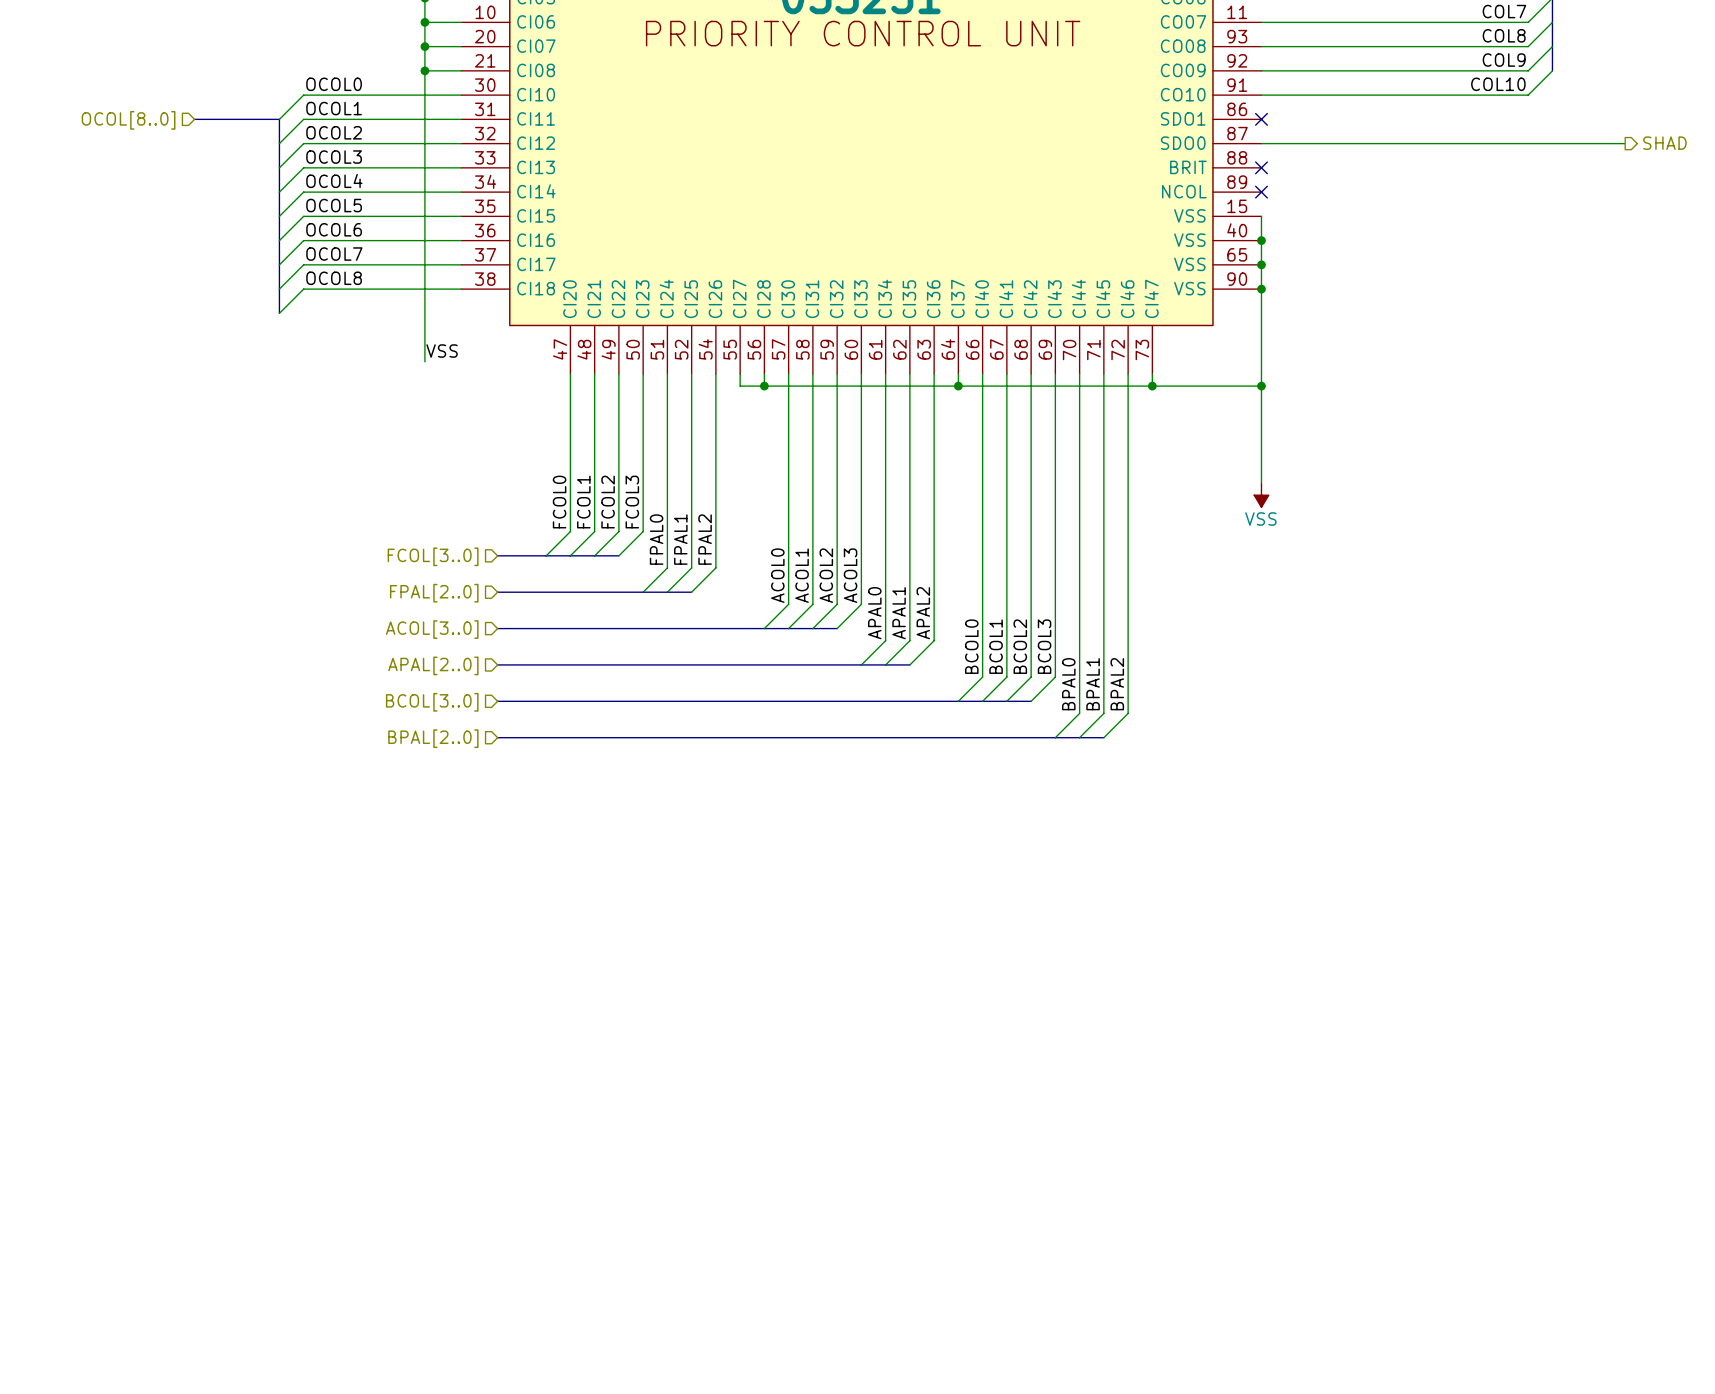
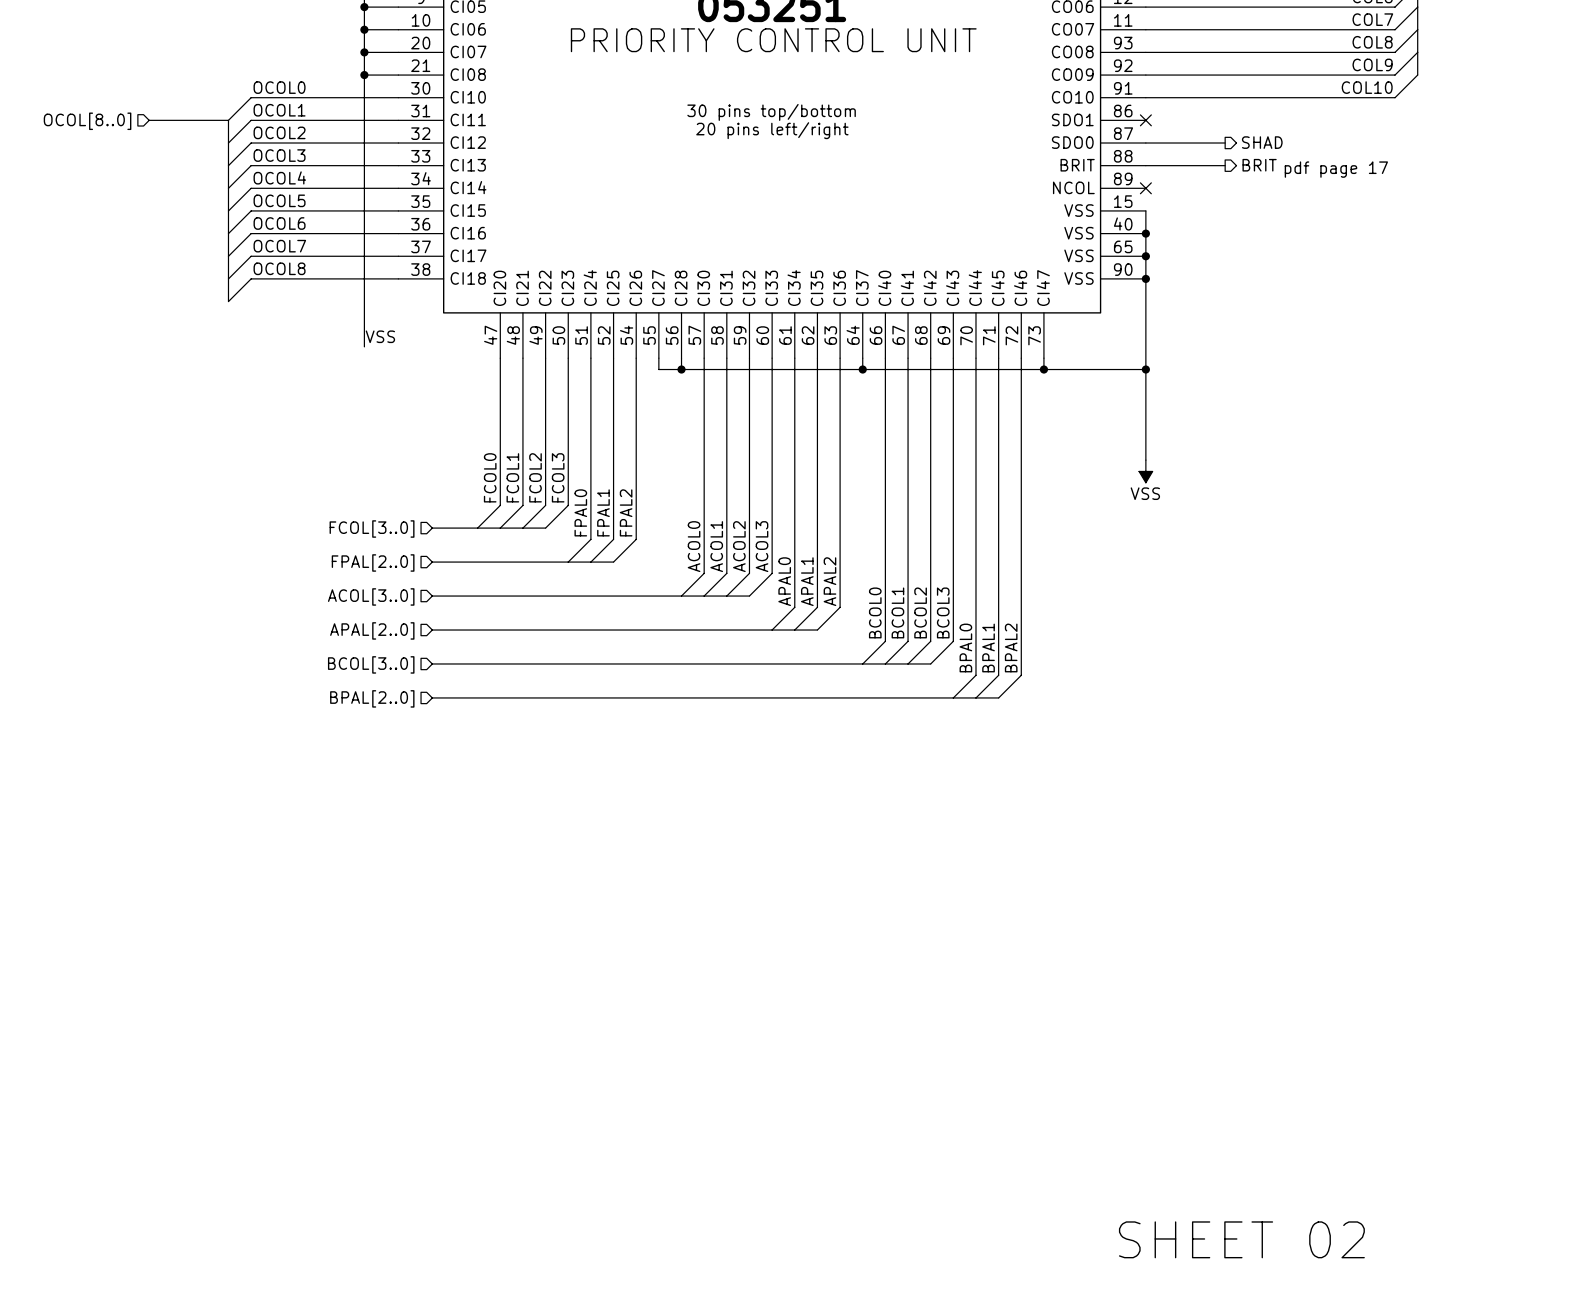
part text: none -> 30 pins top/bottom (771, 112)
part text: none -> 20 pins left/right (772, 130)
wire: (1346, 143) (1625, 143) -> none
hierarchical label: none -> SHAD (1262, 142)
hierarchical label: SHAD (1664, 143) -> none
wire: none -> (1145, 165) (1225, 165)
no-connect mark: (1261, 167) -> none
hierarchical label: none -> BRIT (1259, 165)
text: none -> pdf page 17 (1336, 169)
text: none -> SHEET 02 (1241, 1239)

